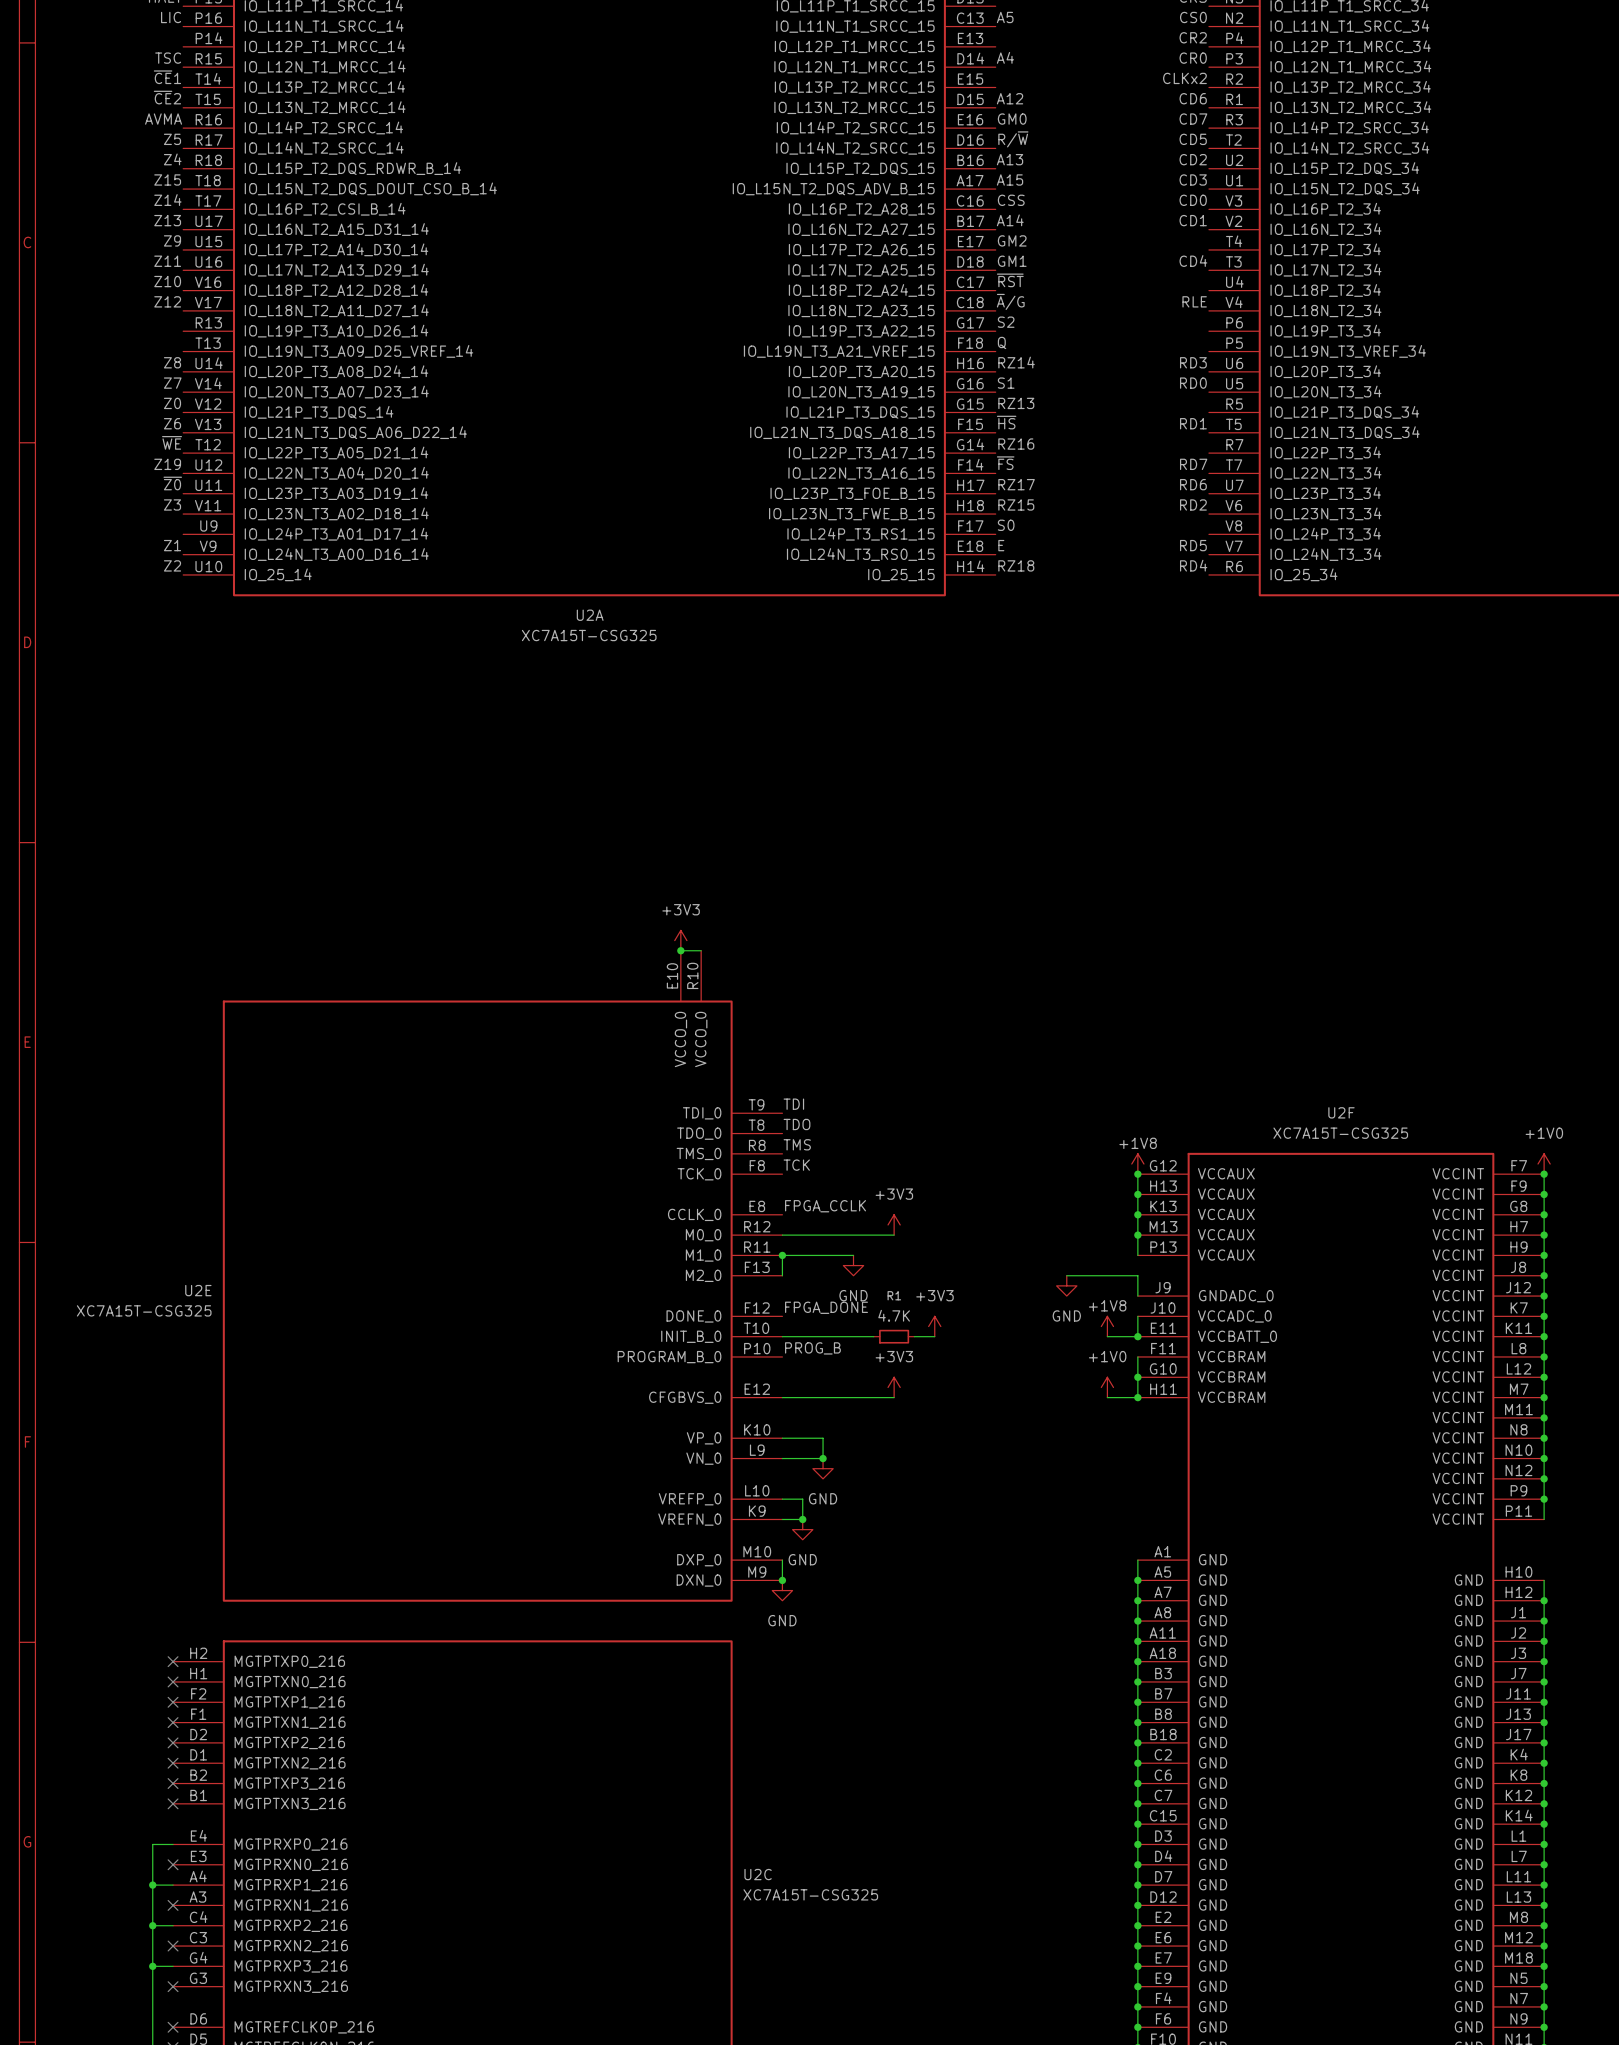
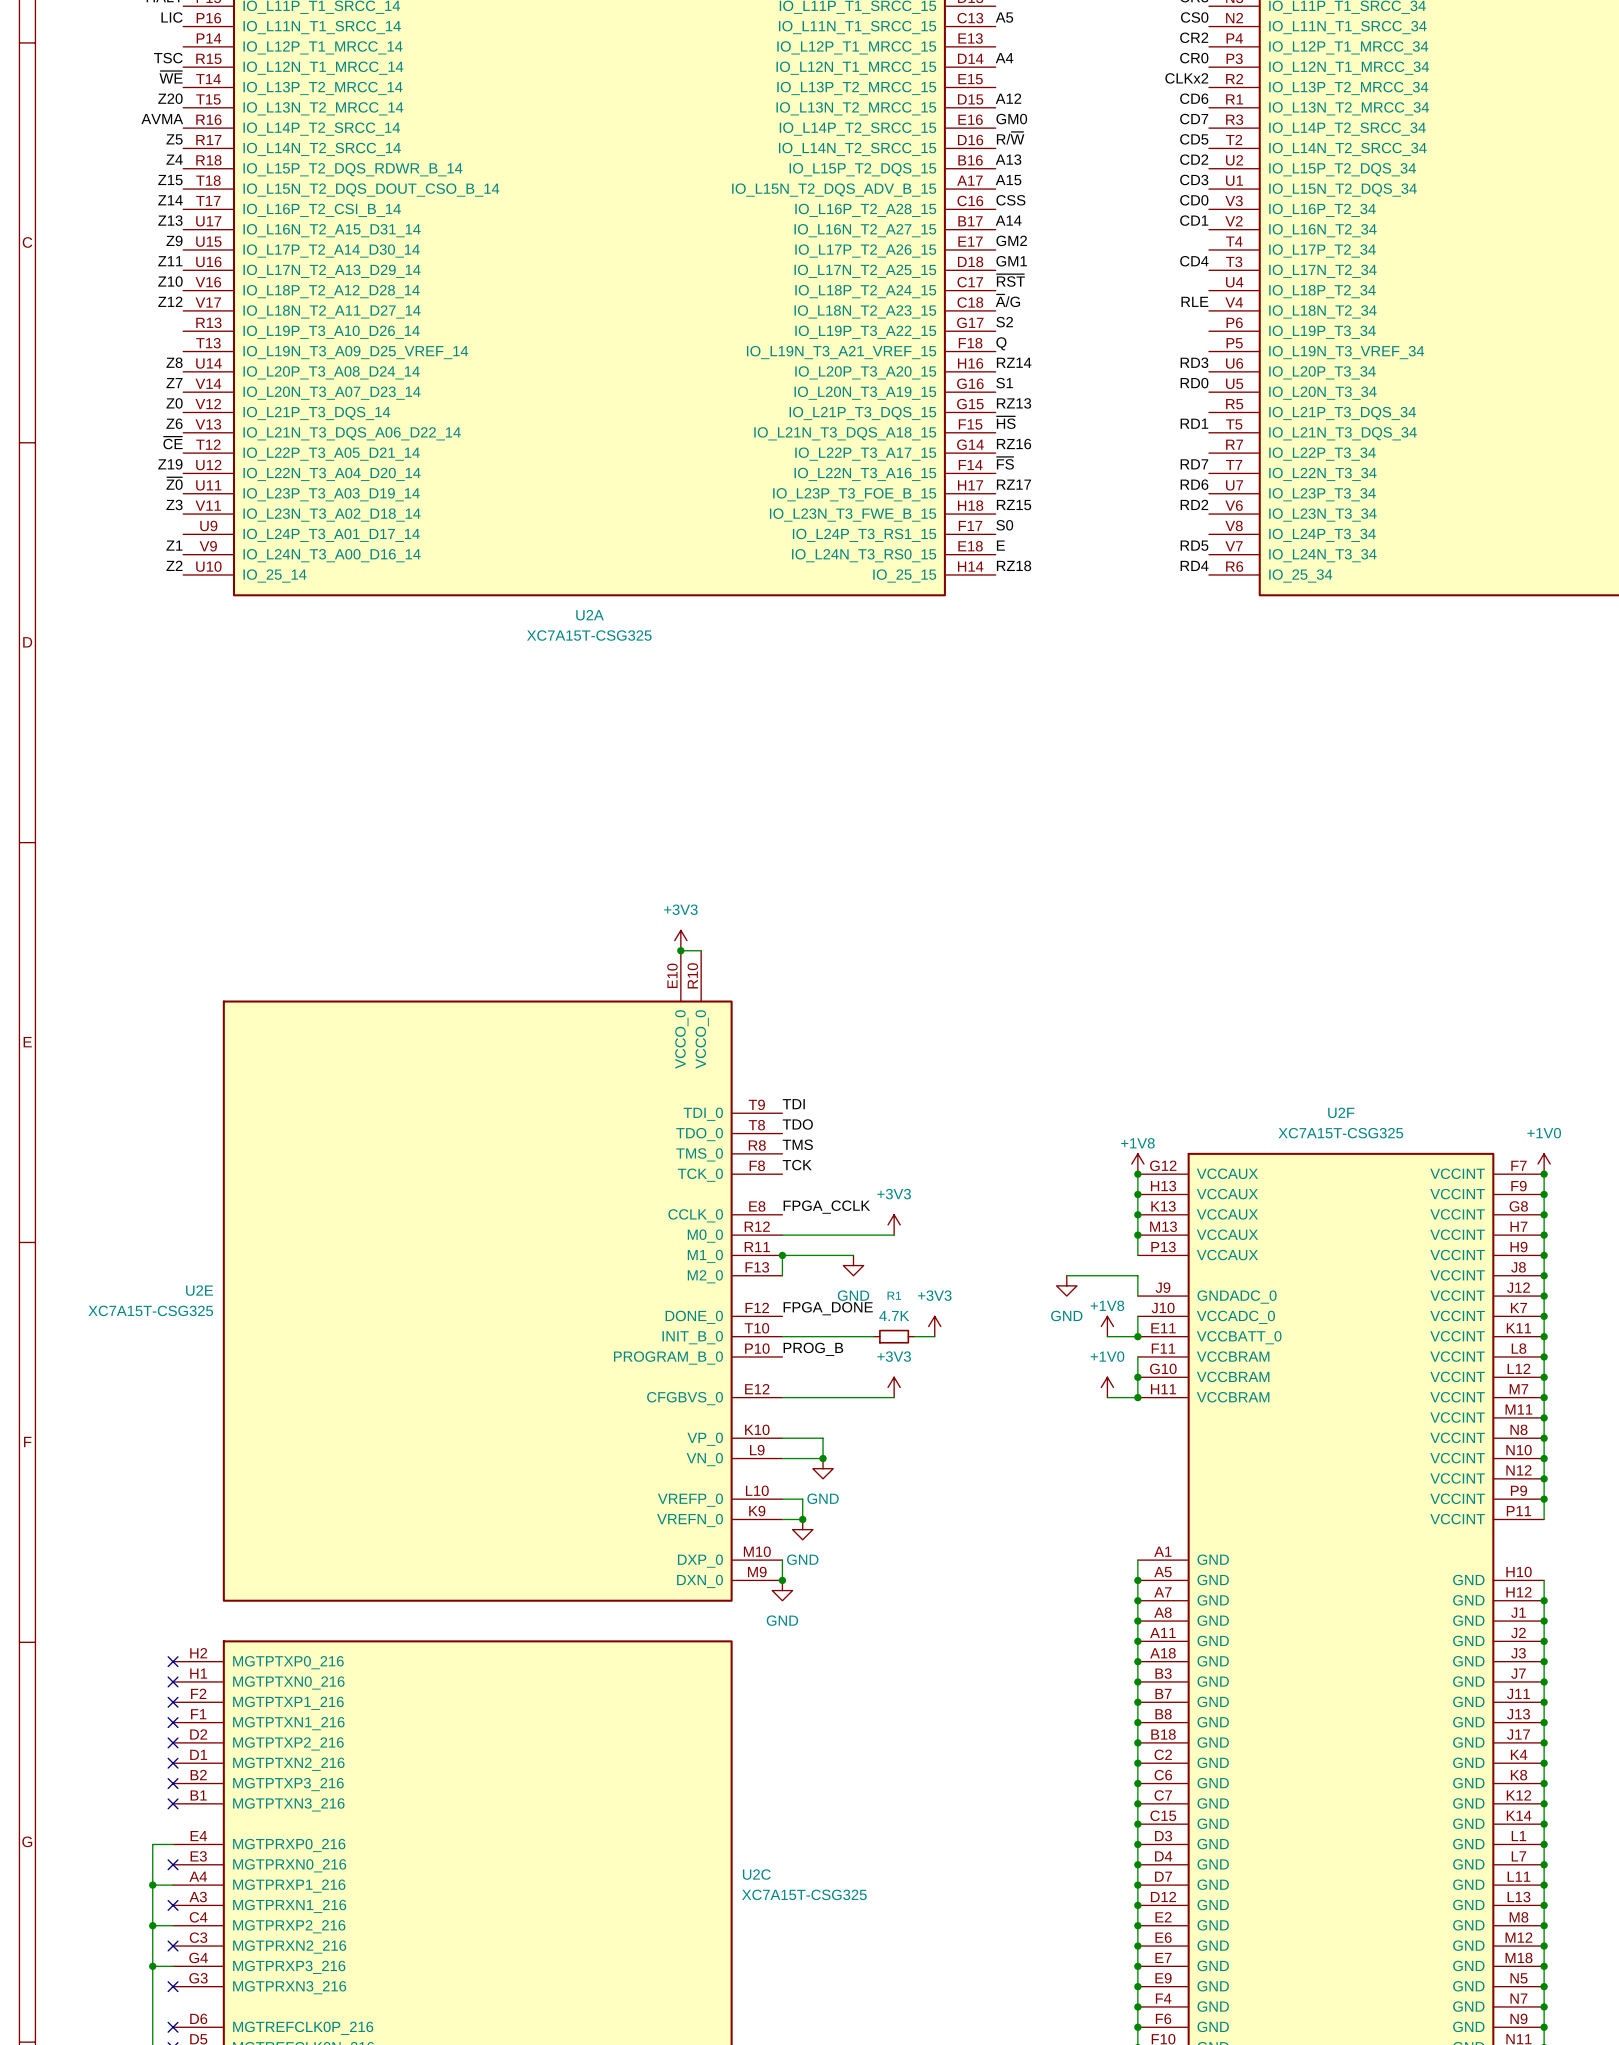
label: ~{CE}1 (167, 77) -> ~{WE} (171, 77)
label: ~{CE}2 (167, 97) -> Z20 (170, 98)
label: ~{WE} (172, 442) -> ~{CE} (173, 442)

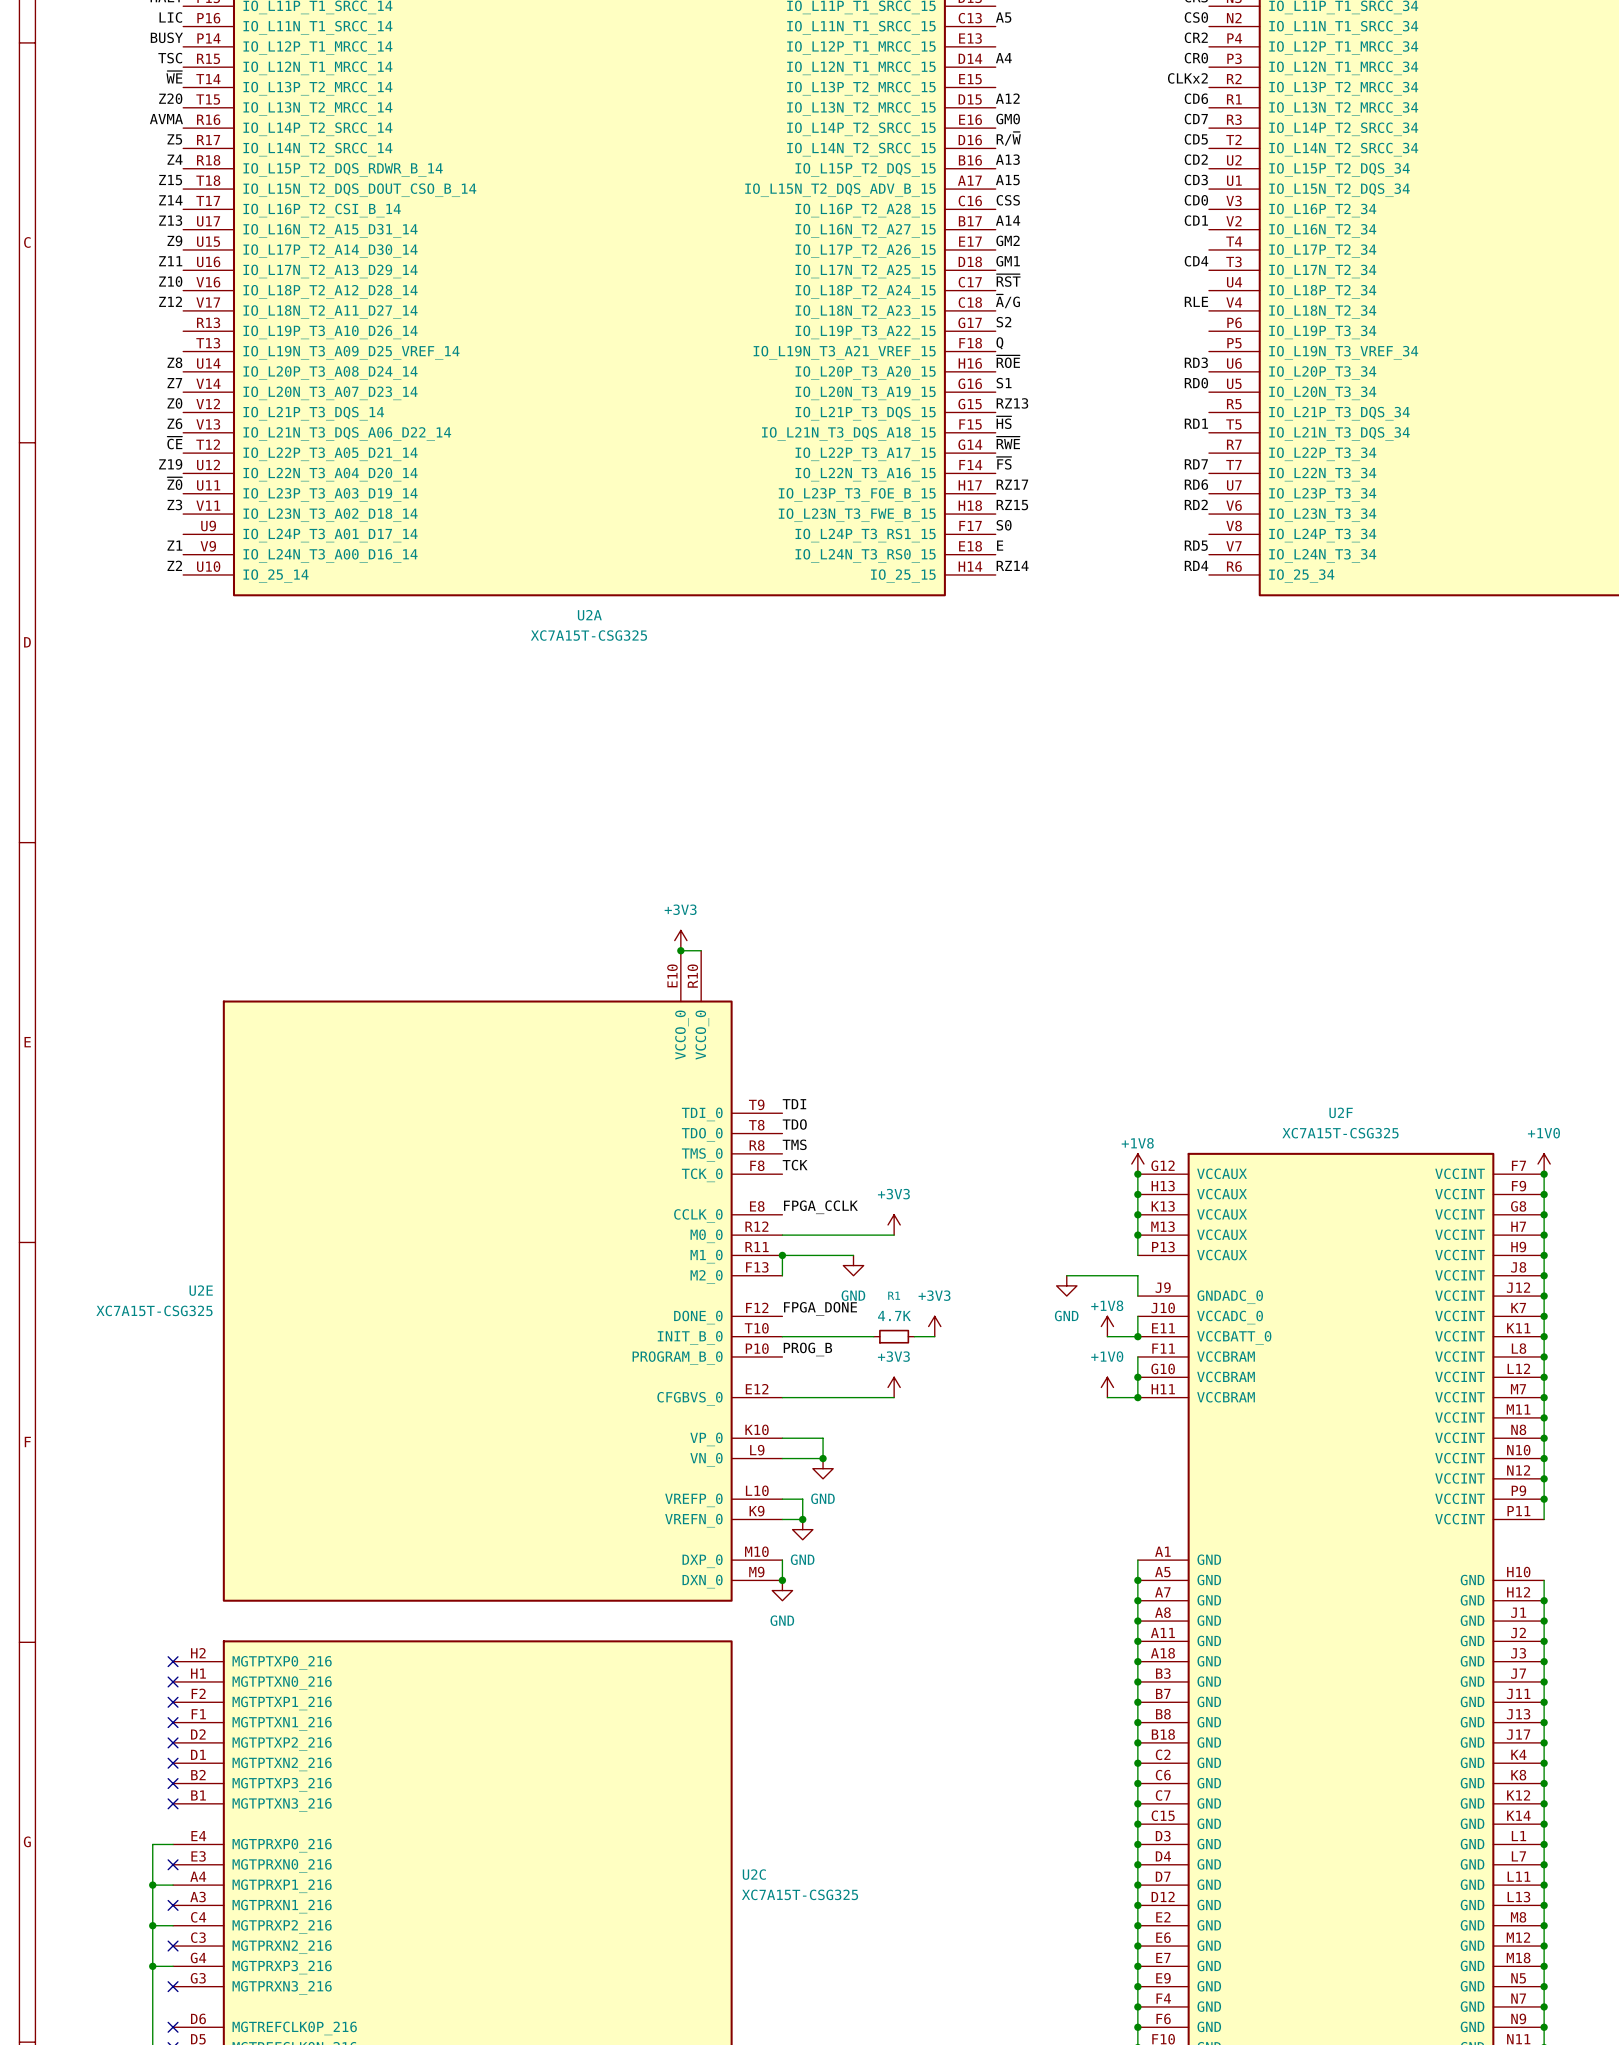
label: none -> BUSY (166, 37)
label: RZ14 (1014, 362) -> ~{ROE} (1008, 361)
label: RZ16 (1014, 444) -> ~{RWE} (1008, 442)
label: RZ18 (1014, 565) -> RZ14 (1012, 565)

